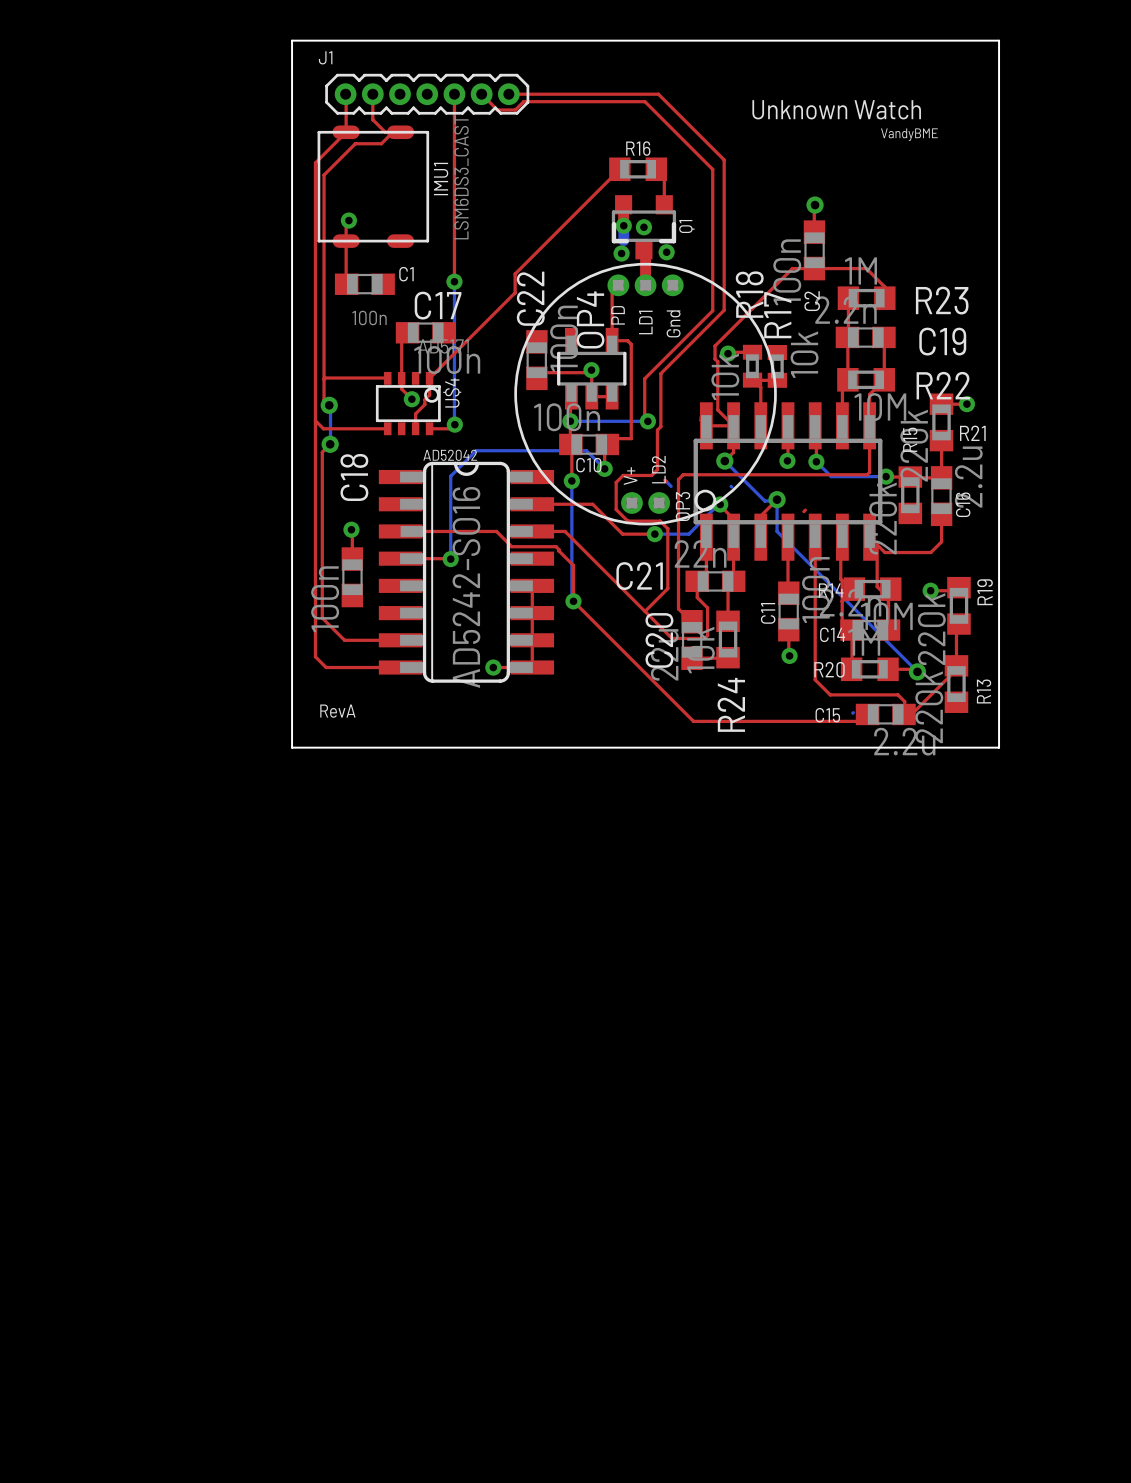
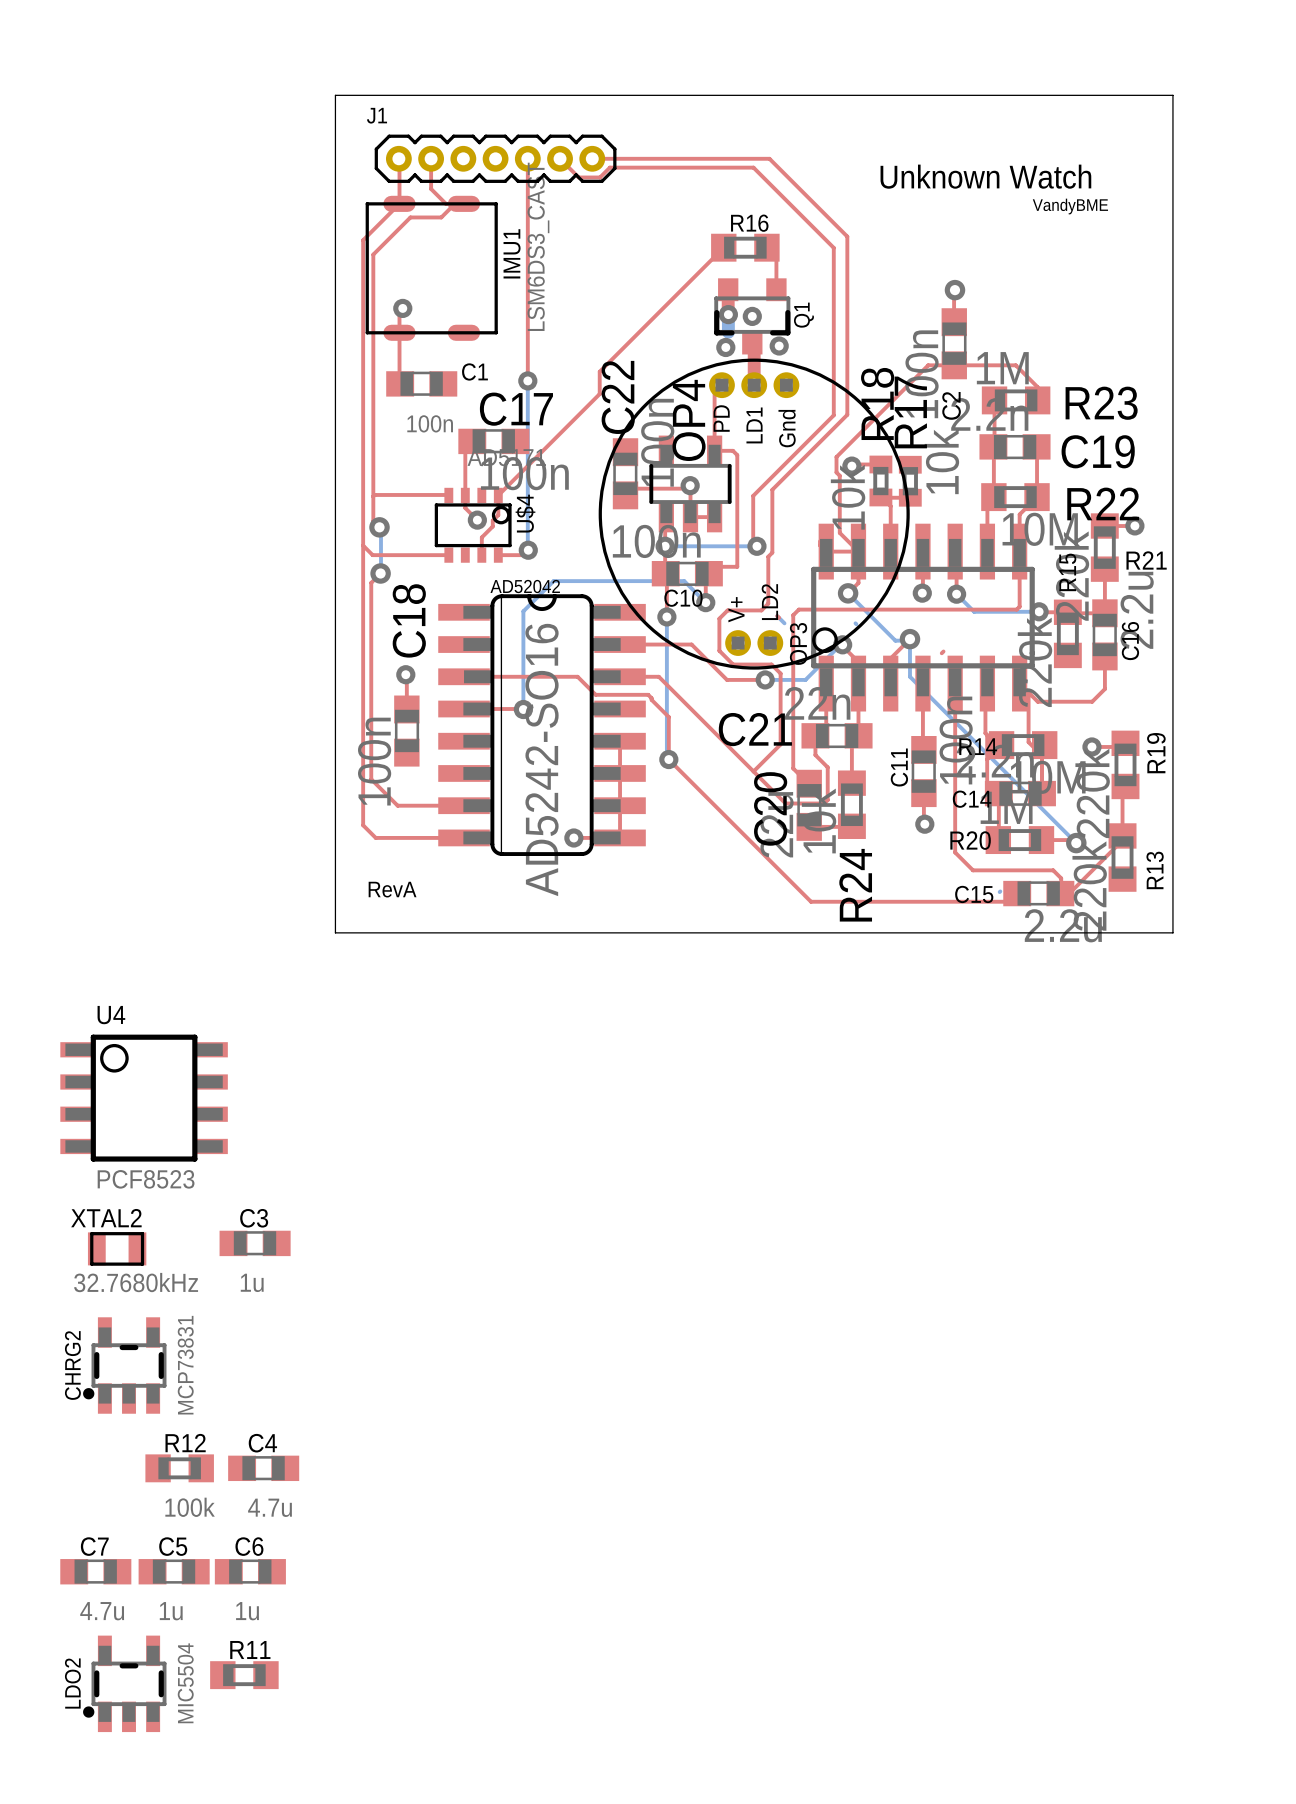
U4: none -> PCF8523 (144, 1098)
C3: none -> 1u (255, 1243)
XTAL2: none -> 32.7680kHz (117, 1248)
CHRG2: none -> MCP73831 (124, 1365)
R12: none -> 100k (179, 1468)
C4: none -> 4.7u (263, 1468)
C7: none -> 4.7u (95, 1571)
C5: none -> 1u (174, 1571)
C6: none -> 1u (250, 1571)
R11: none -> (244, 1675)
LDO2: none -> MIC5504 (124, 1683)

